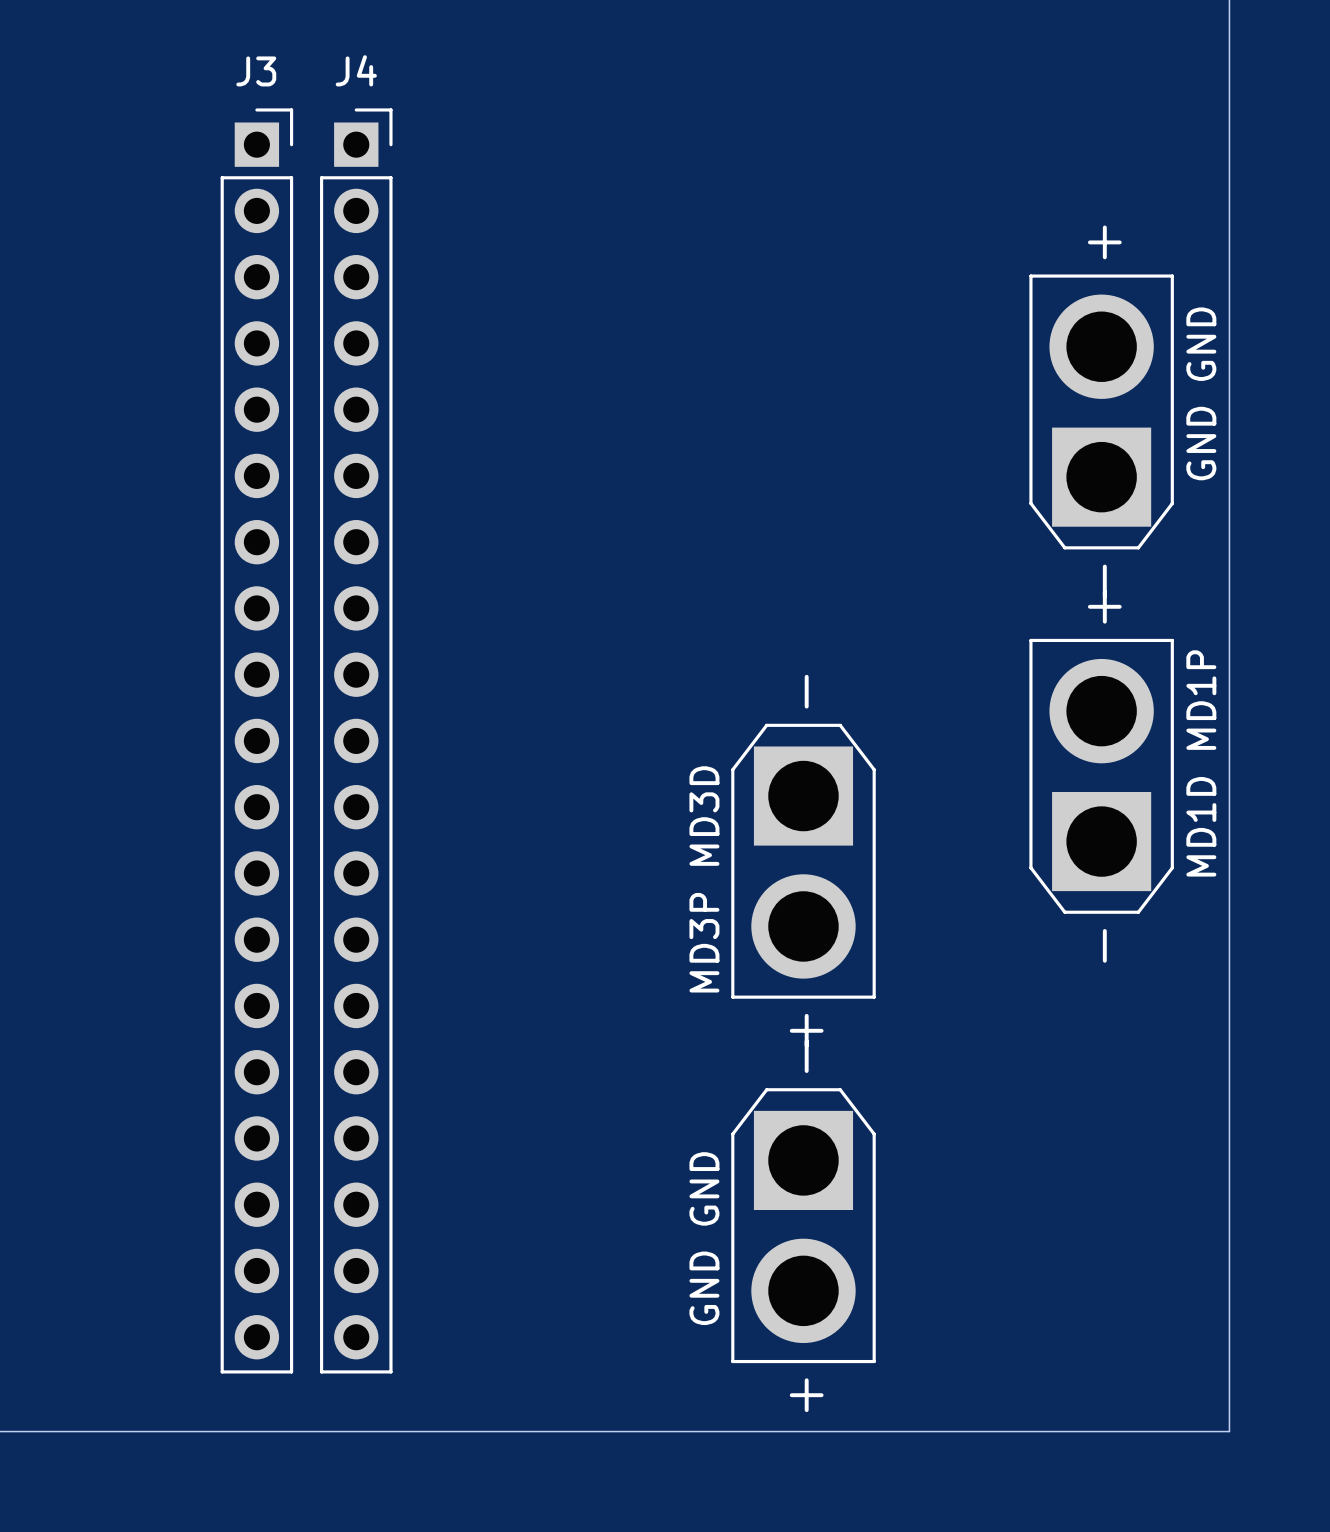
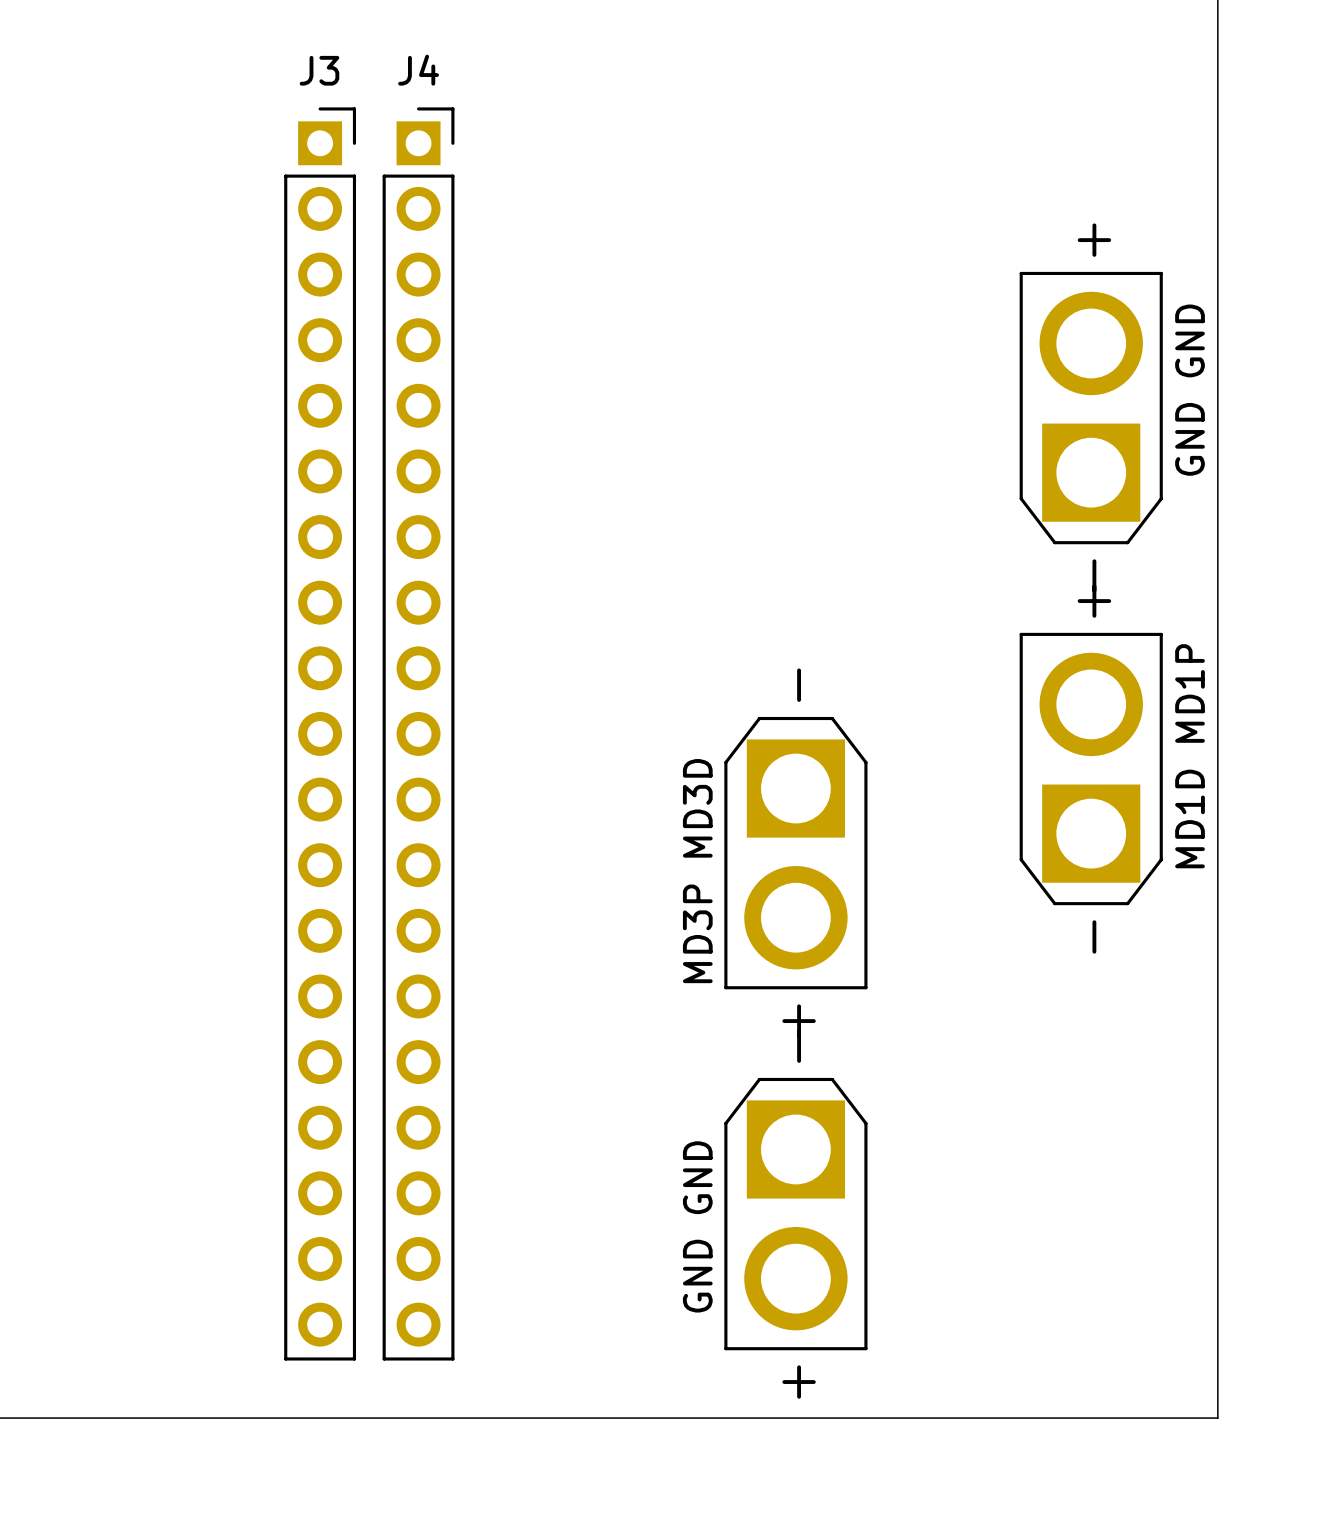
J3 position: (256, 740) -> (320, 733)
J4 position: (356, 740) -> (418, 733)

